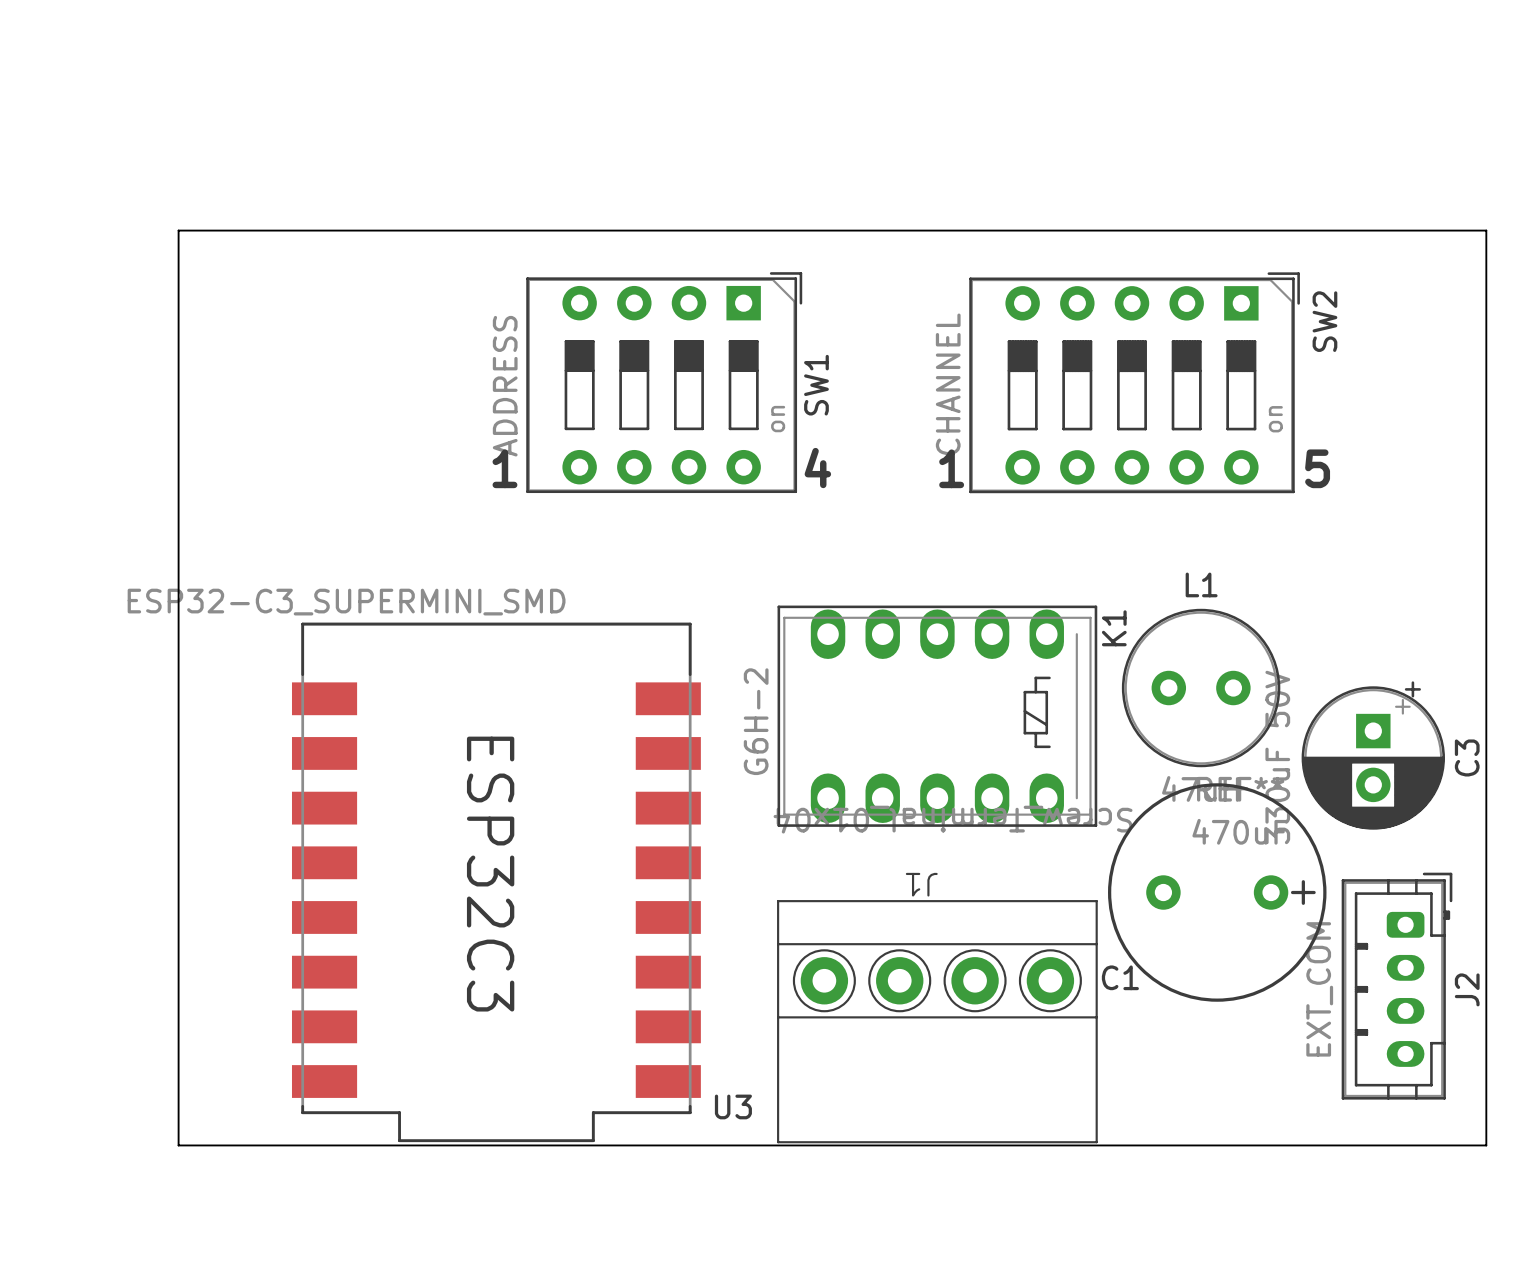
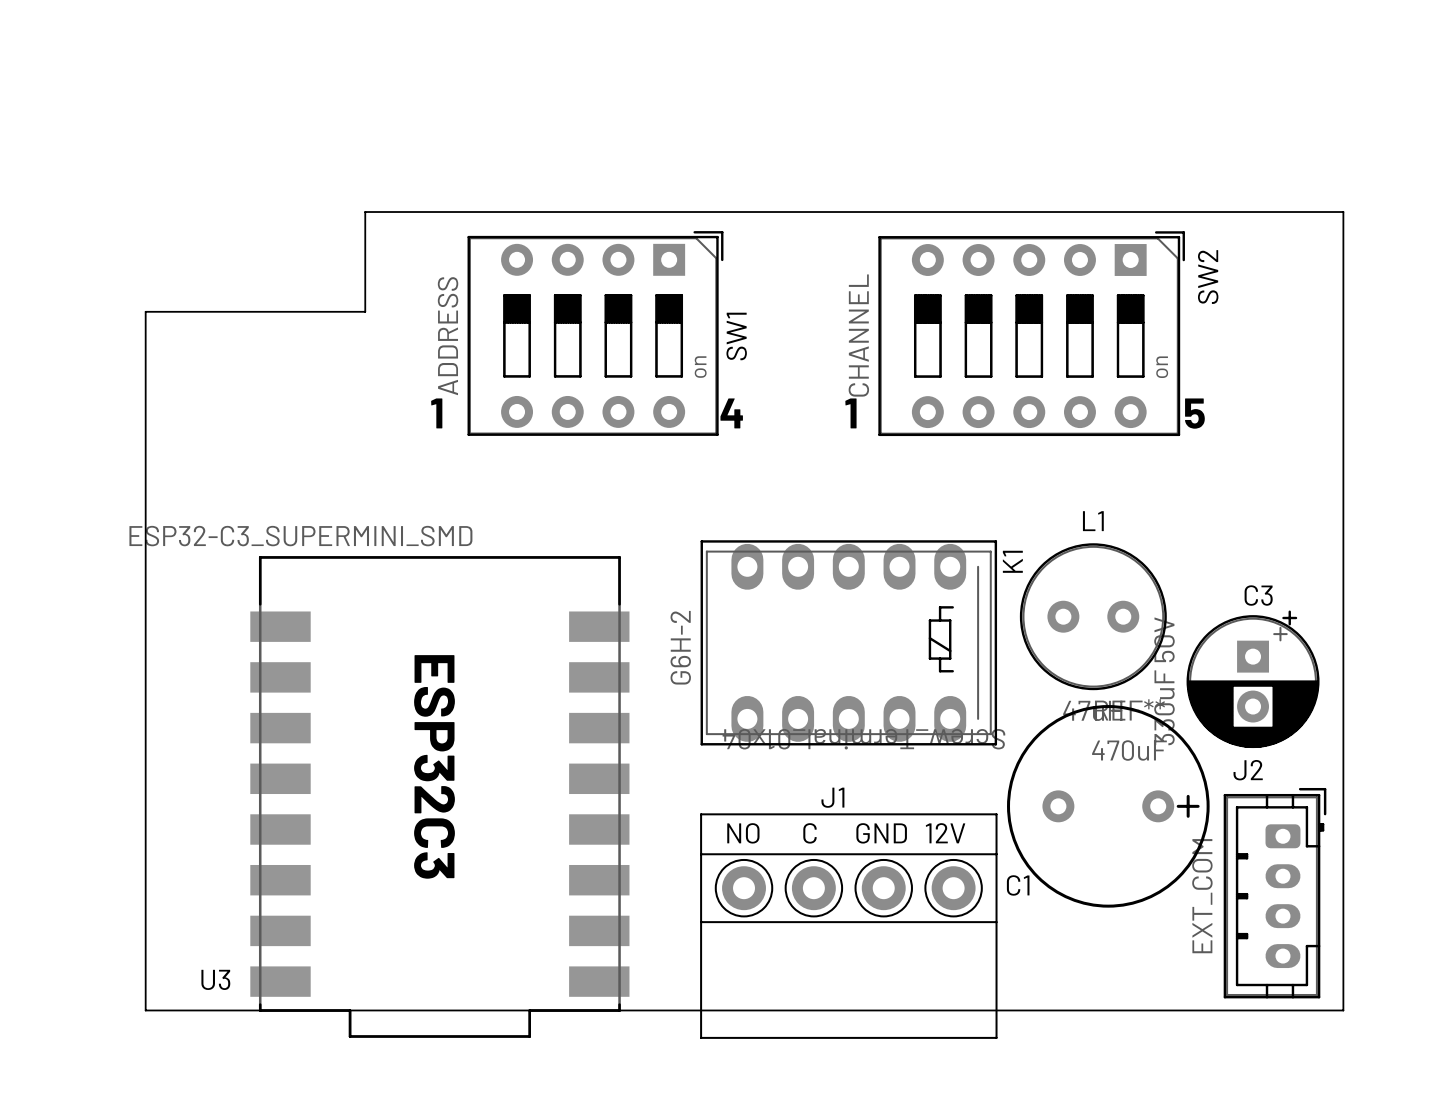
board edge: (178, 230) (1486, 230) (1486, 1145) (178, 1145) (178, 230) -> (365, 212) (365, 311) (145, 311) (145, 1010) (1343, 1010) (1343, 212) (365, 212)
C3 name rotation: 0° (1467, 757) -> 90° clockwise (1258, 595)
C3 name position: C3 (1467, 757) -> C3 (1258, 595)
J1 name rotation: 0° (921, 884) -> 180° (832, 797)
text: none -> NO (743, 833)
text: none -> C (810, 833)
text: none -> GND (881, 833)
text: none -> 12V (945, 833)
J2 name rotation: 0° (1467, 989) -> 90° clockwise (1248, 770)
J2 name position: J2 (1467, 989) -> J2 (1248, 770)
U3 name position: U3 (733, 1106) -> U3 (215, 979)

